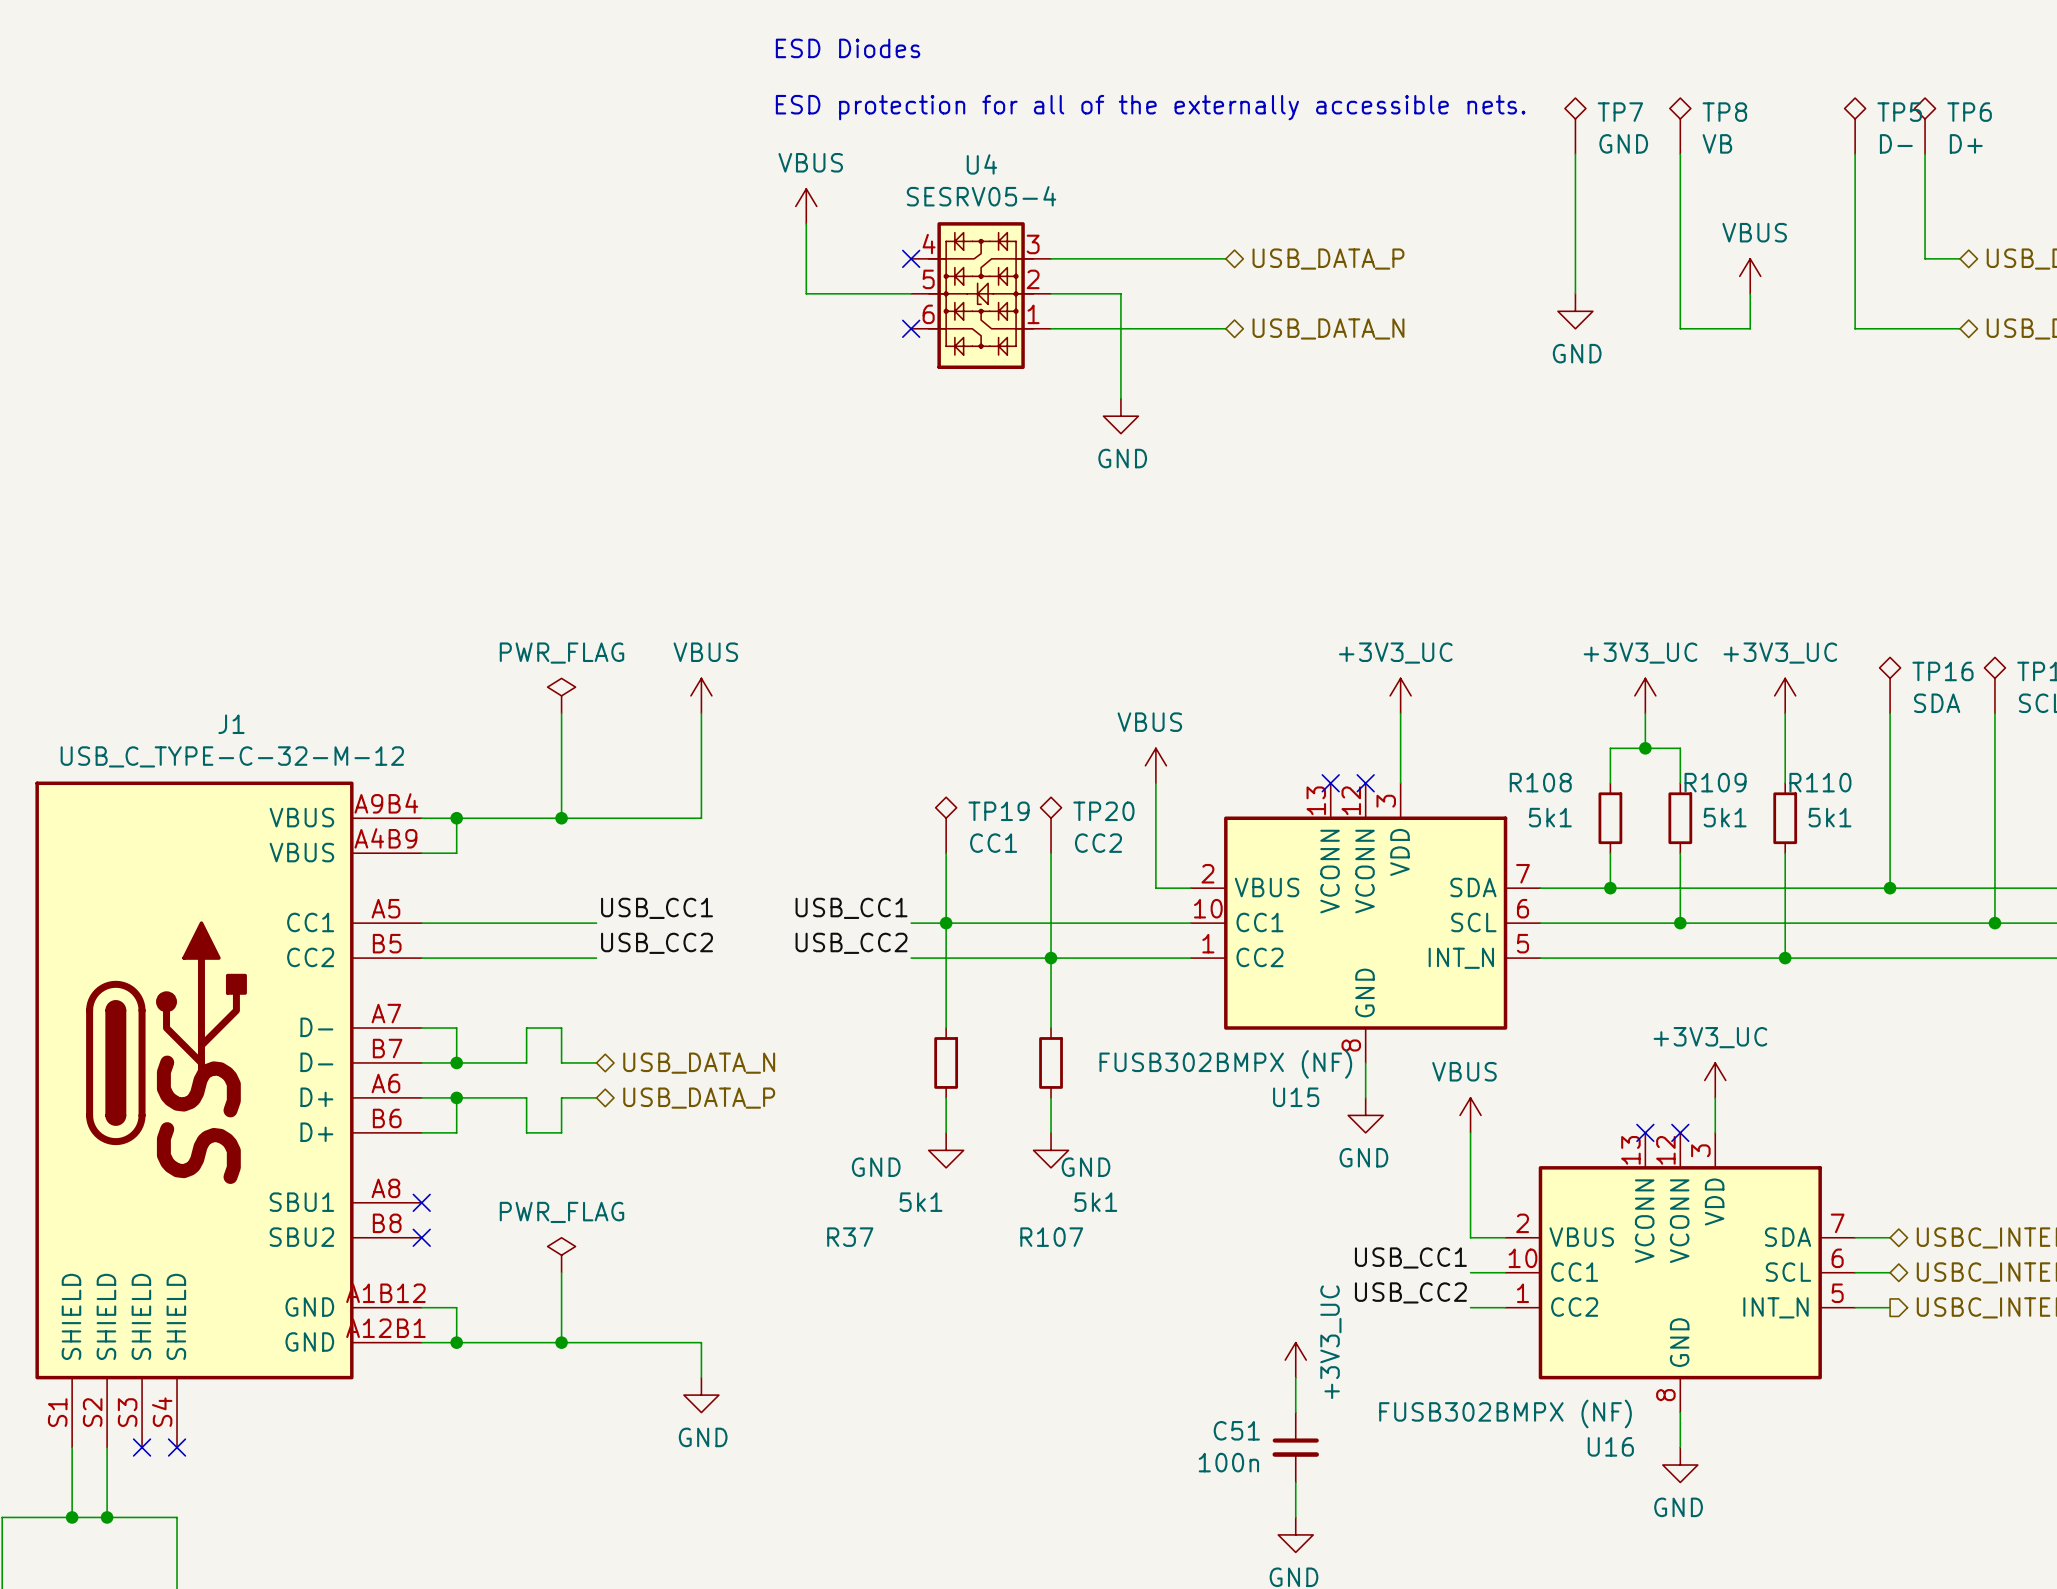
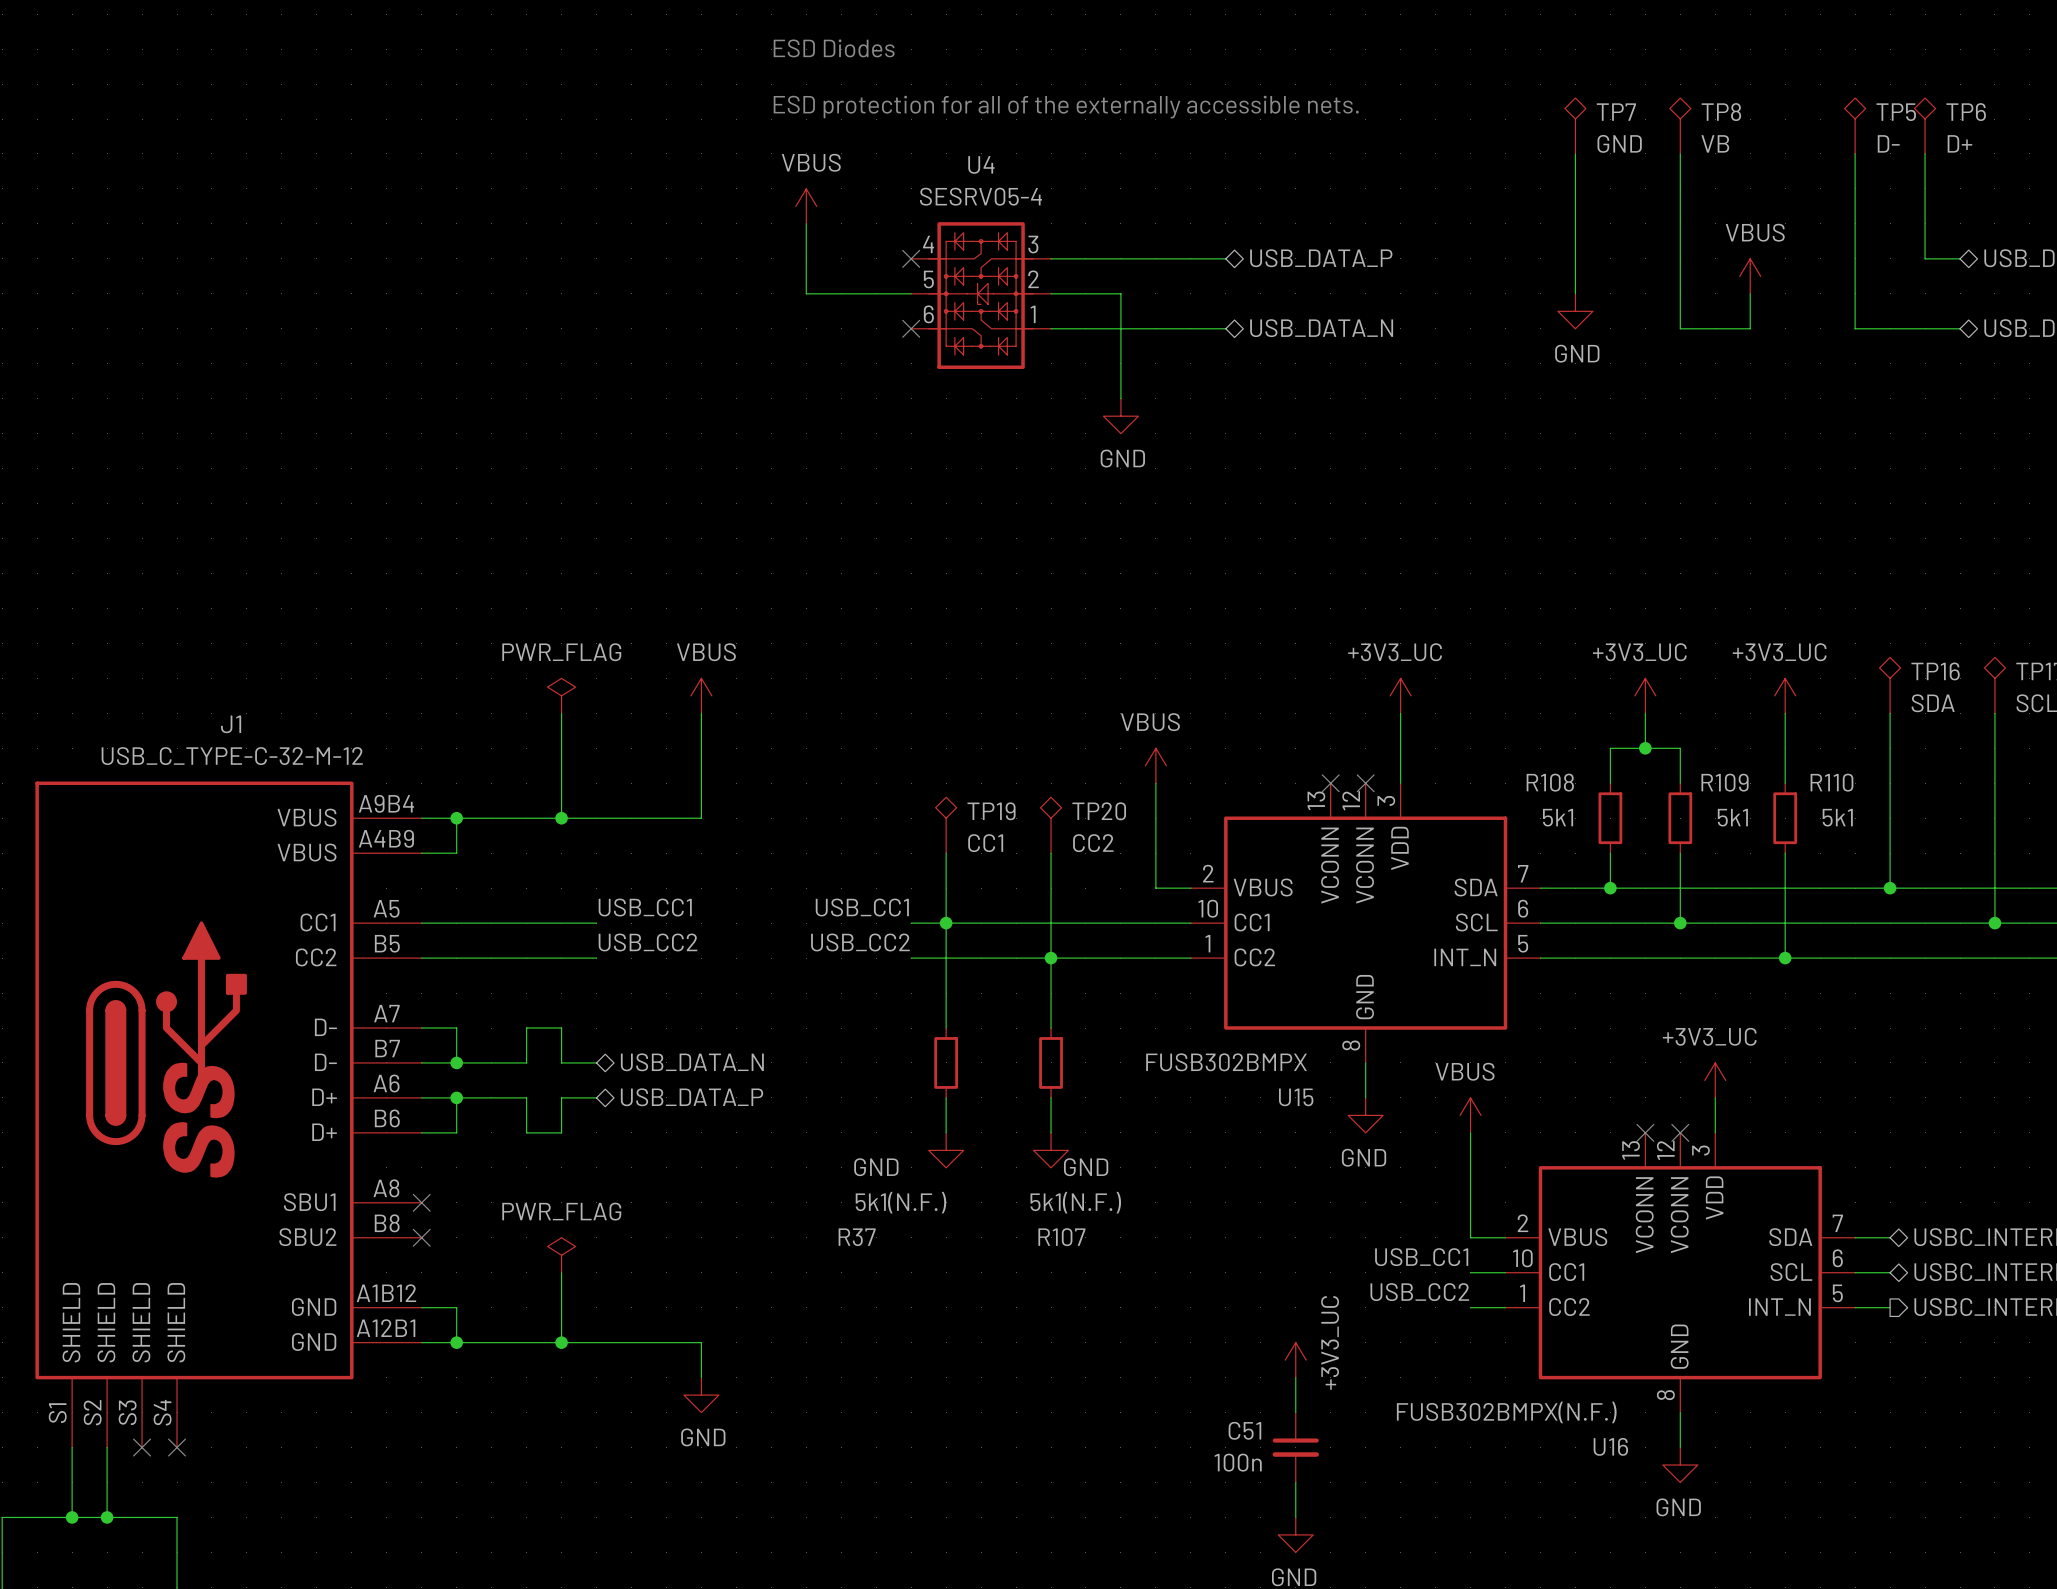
U15 value: FUSB302BMPX (NF) (1225, 1064) -> FUSB302BMPX (1226, 1062)
R37 value: 5k1 (921, 1202) -> 5k1(N.F.) (900, 1202)
R107 value: 5k1 (1095, 1202) -> 5k1(N.F.) (1075, 1202)
U16 value: FUSB302BMPX (NF) (1505, 1414) -> FUSB302BMPX(N.F.) (1506, 1412)

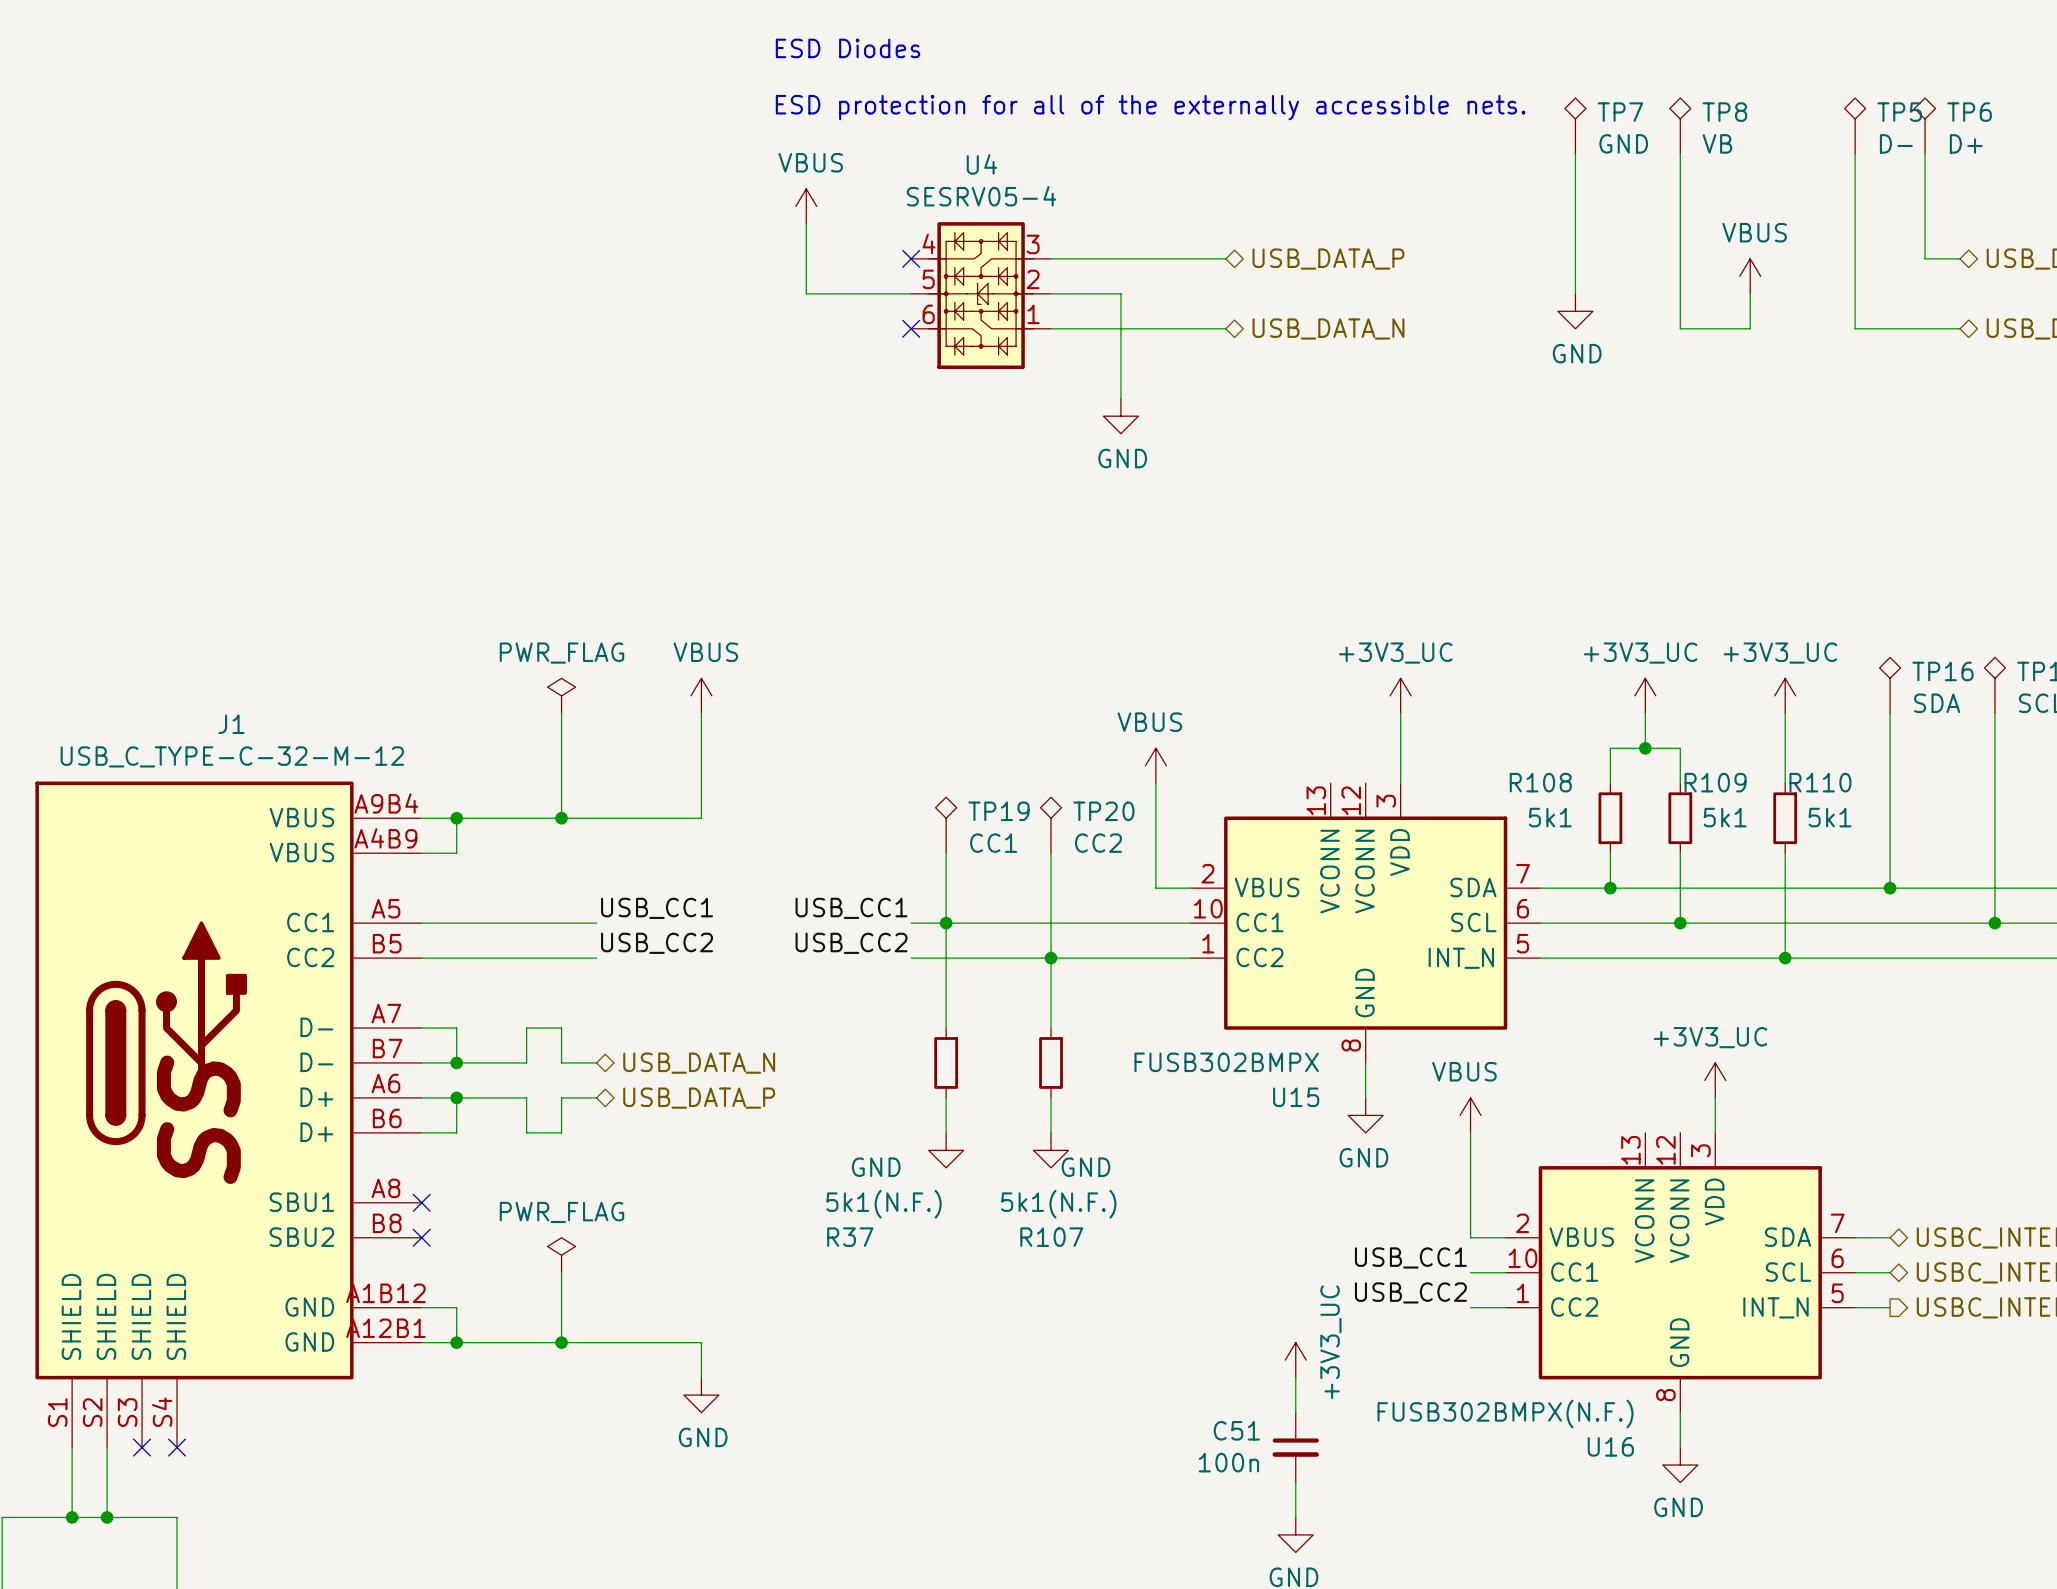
no-connect mark: (1330, 783) -> none
no-connect mark: (1365, 783) -> none
no-connect mark: (1645, 1132) -> none
no-connect mark: (1680, 1132) -> none

